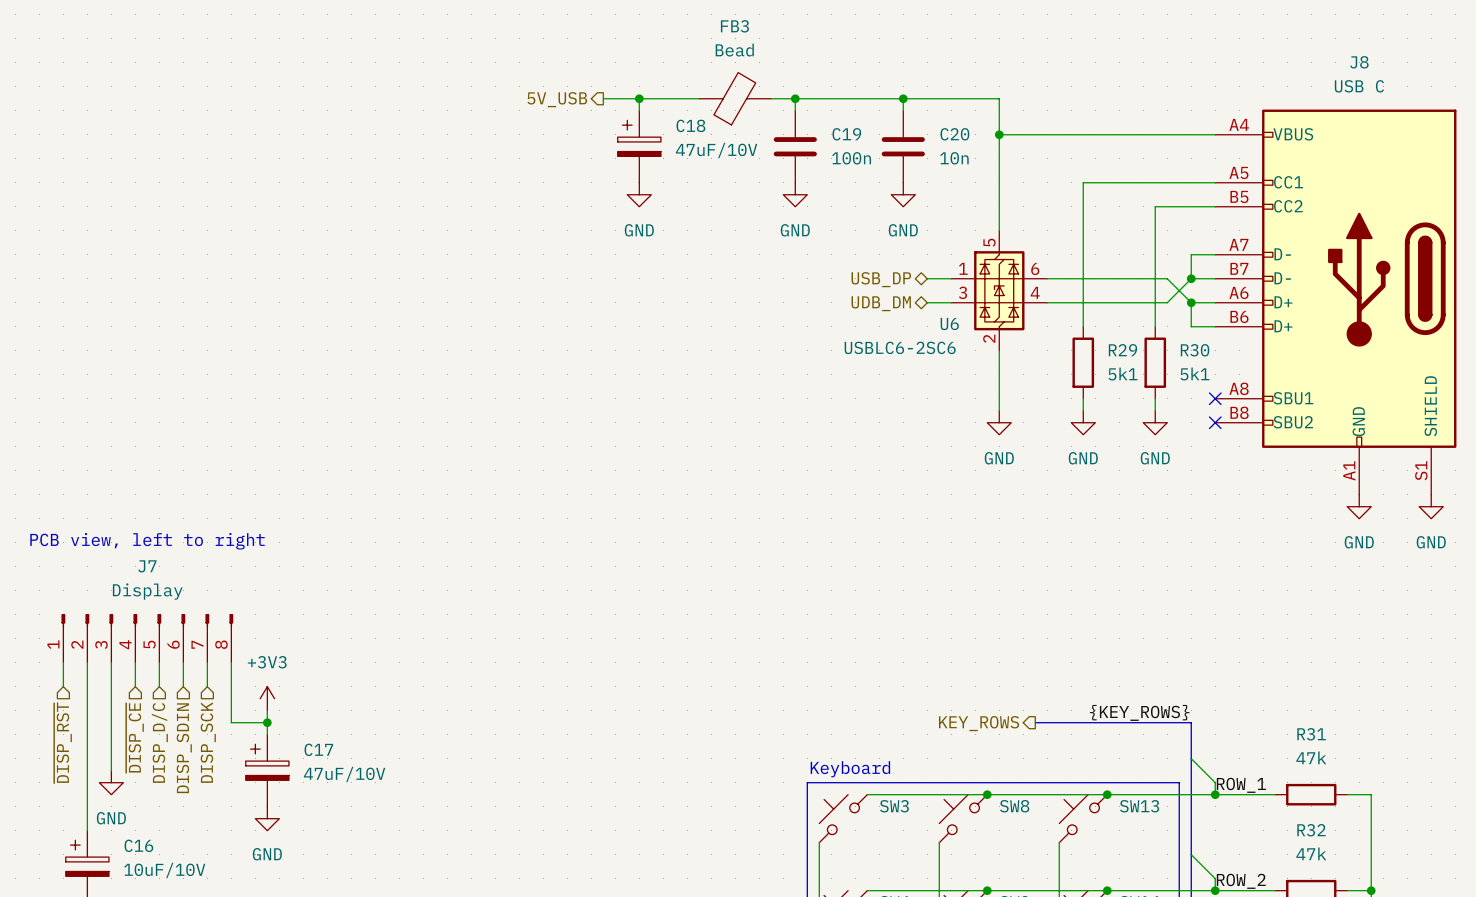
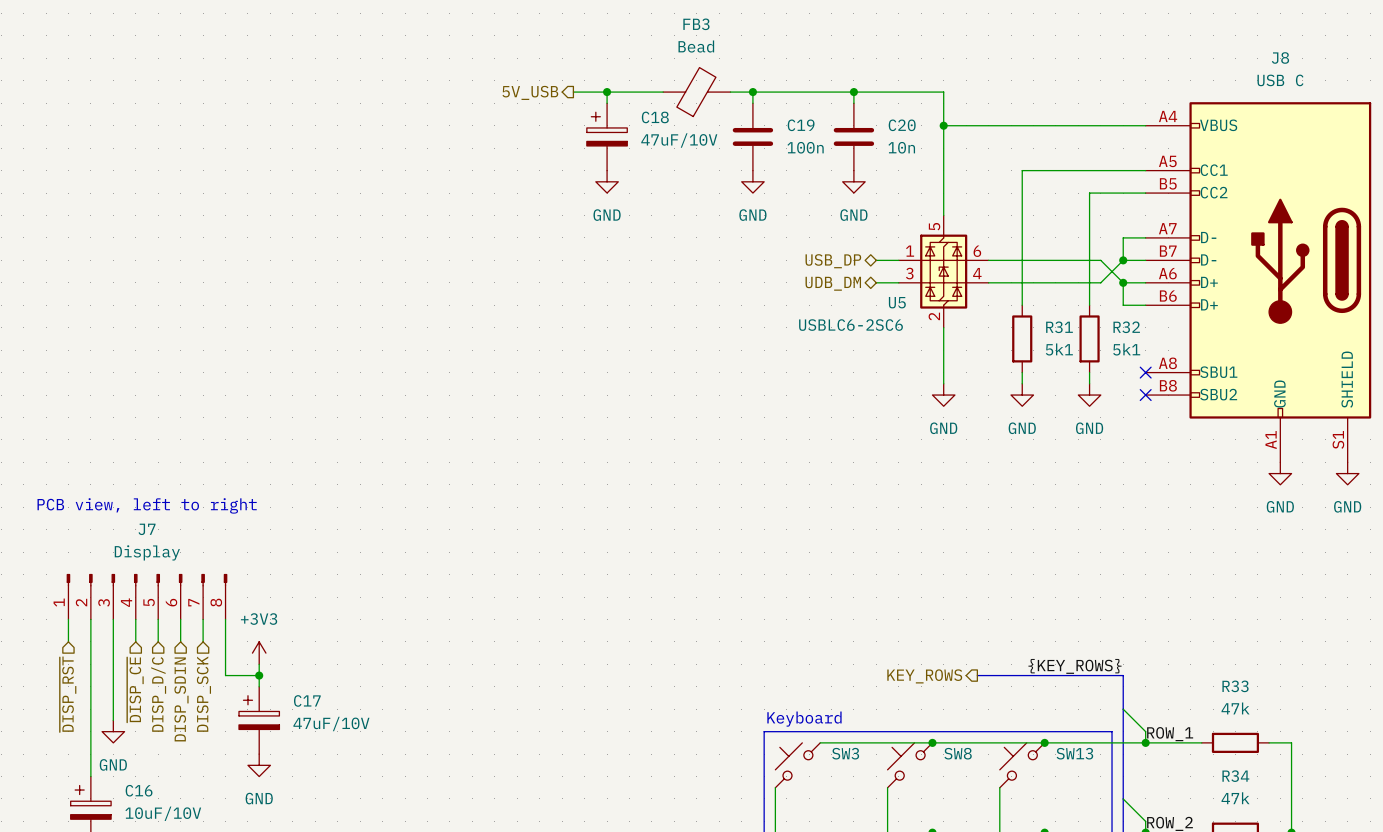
U6 name: U6 (949, 323) -> U5 (897, 302)
R29 name: R29 (1122, 350) -> R31 (1059, 327)
R30 name: R30 (1195, 350) -> R32 (1126, 327)
R31 name: R31 (1311, 734) -> R33 (1235, 686)
R32 name: R32 (1311, 830) -> R34 (1235, 776)

